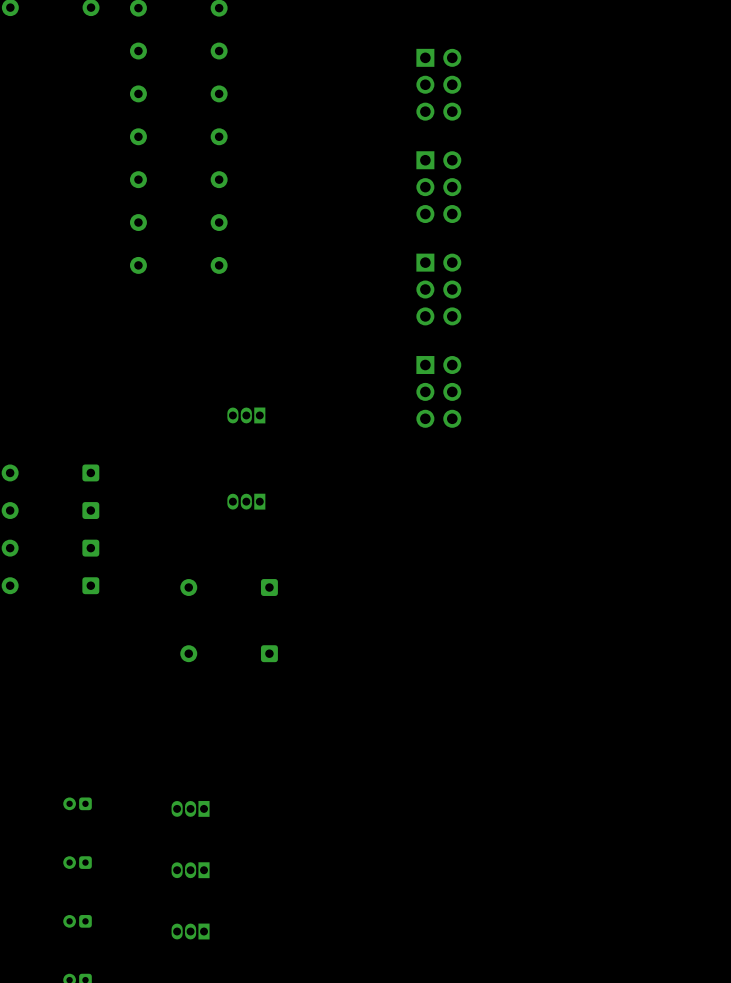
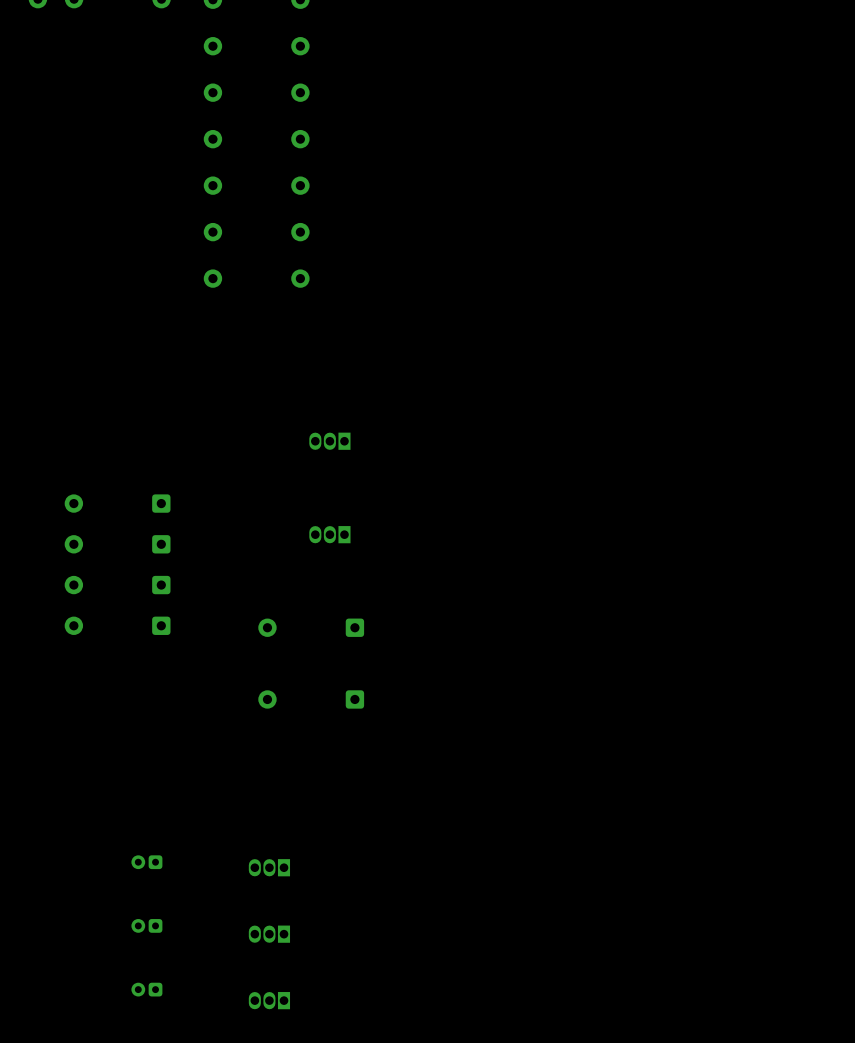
part: (438, 84) -> none
part: (438, 187) -> none
part: (438, 289) -> none
part: (438, 391) -> none

